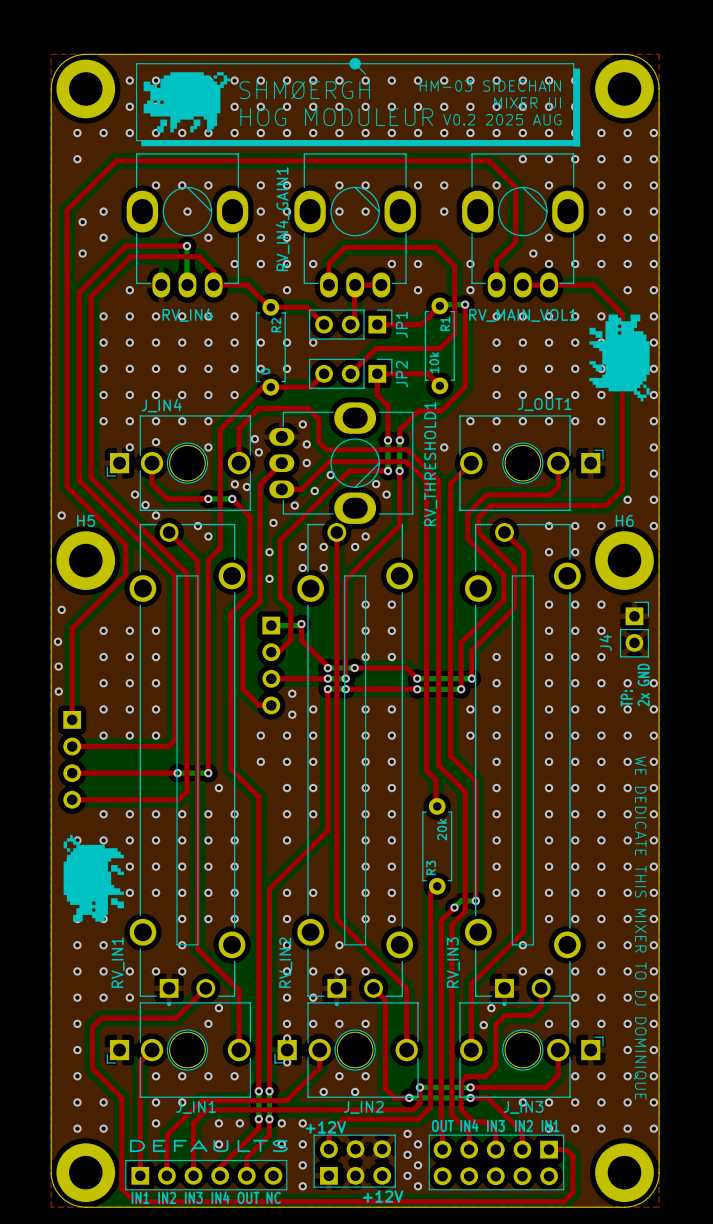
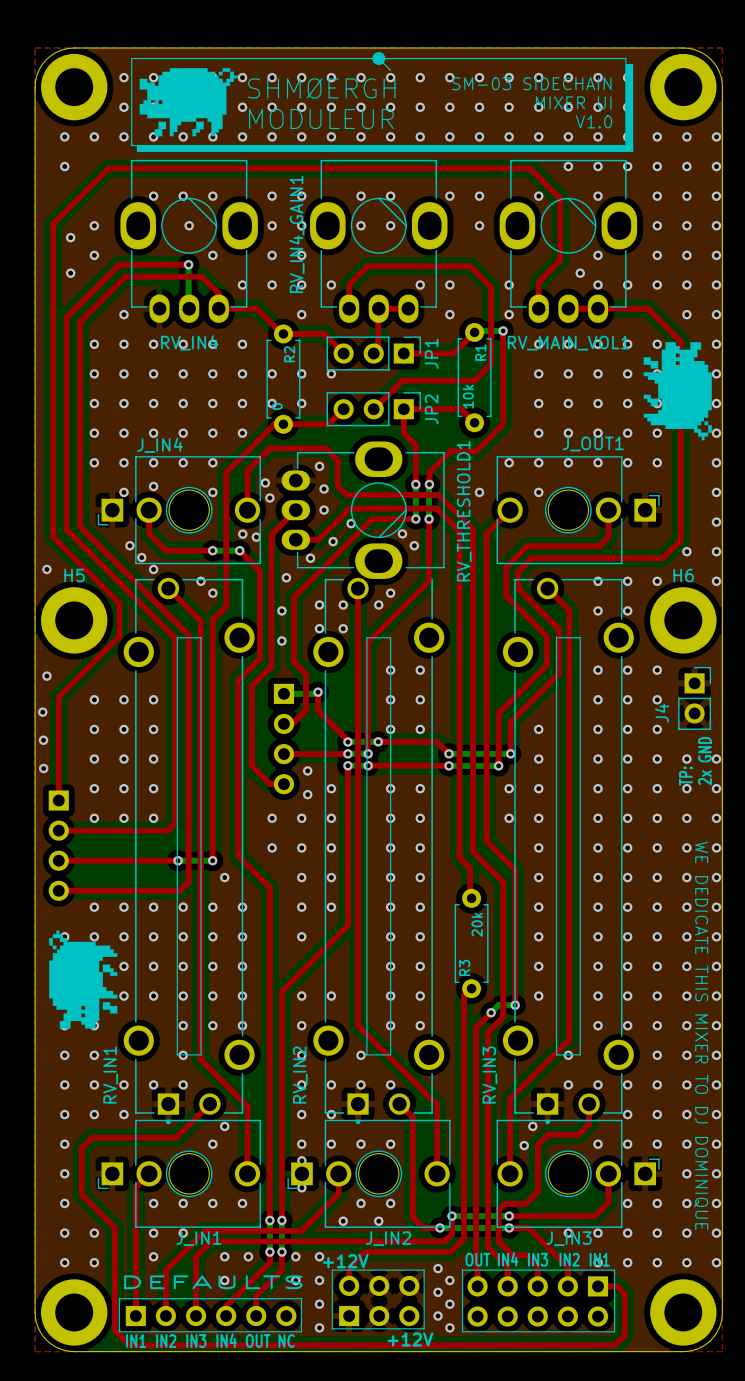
text: HM-03 SIDECHAIN (490, 86) -> SM-03 SIDECHAIN (531, 83)
text: HOG MODULEUR (336, 117) -> MODULEUR (321, 118)
text: V0.2 2025 AUG (502, 119) -> V1.0 (594, 121)

